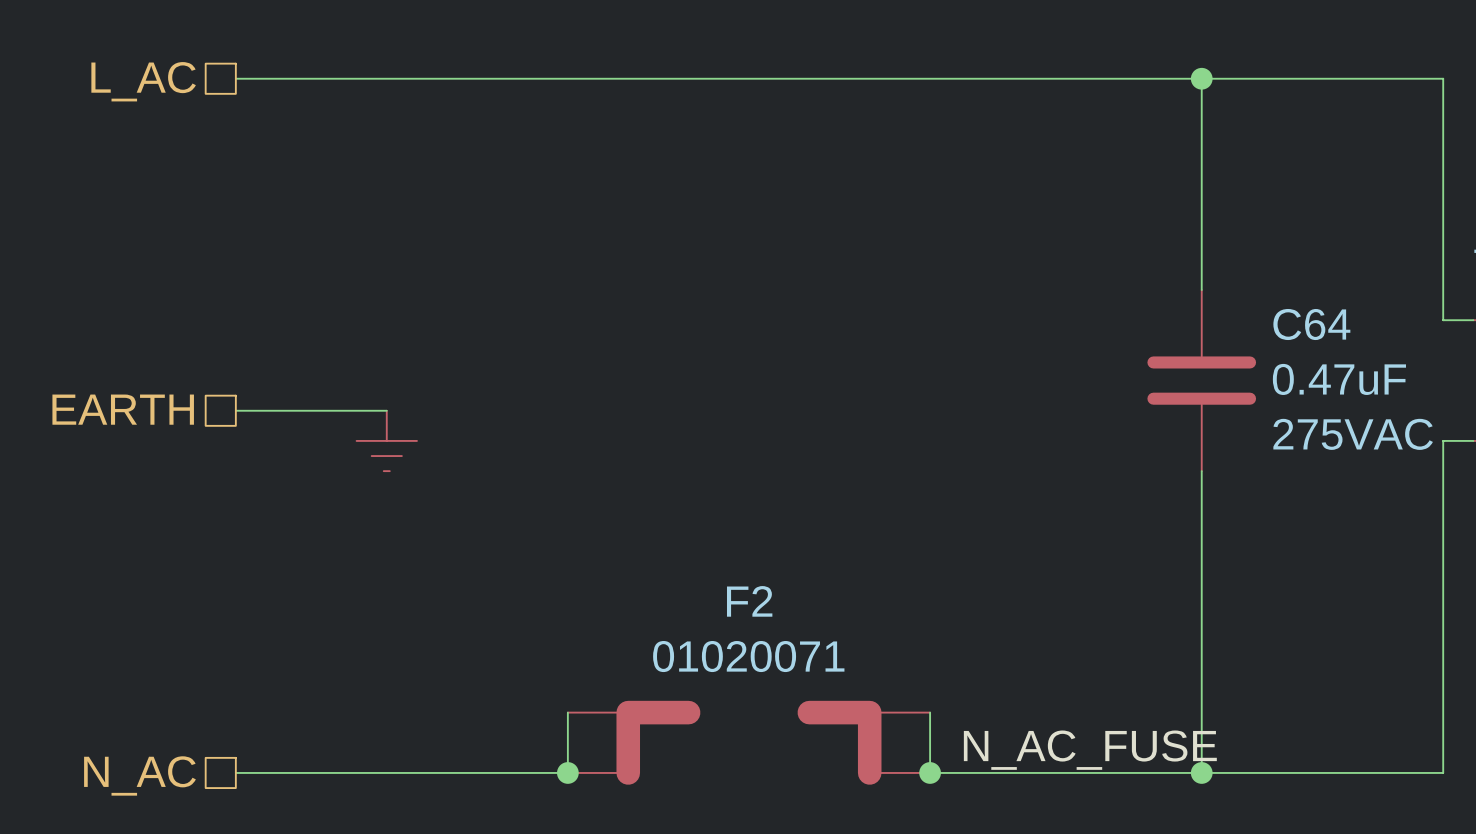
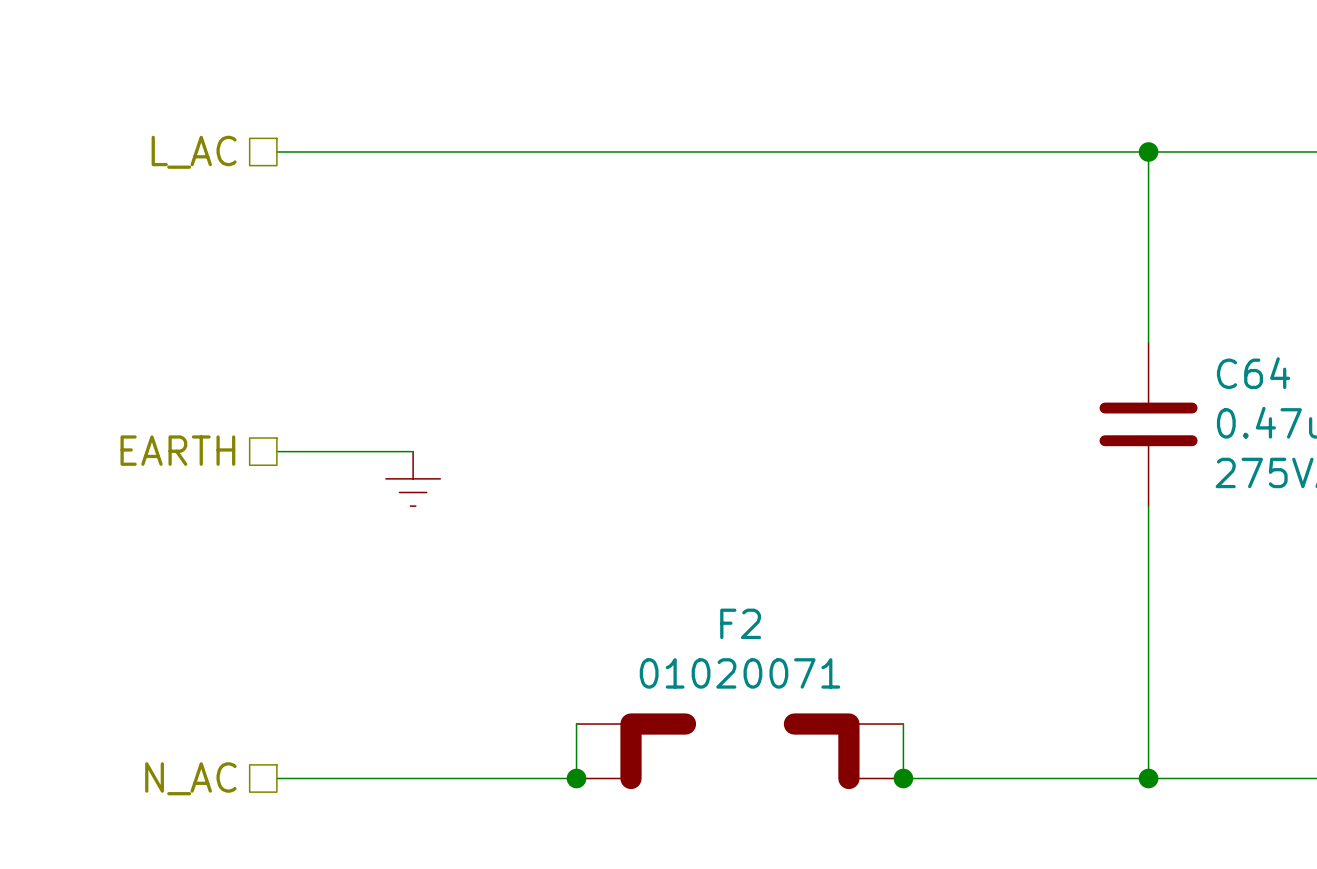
label: N_AC_FUSE (1090, 750) -> none

